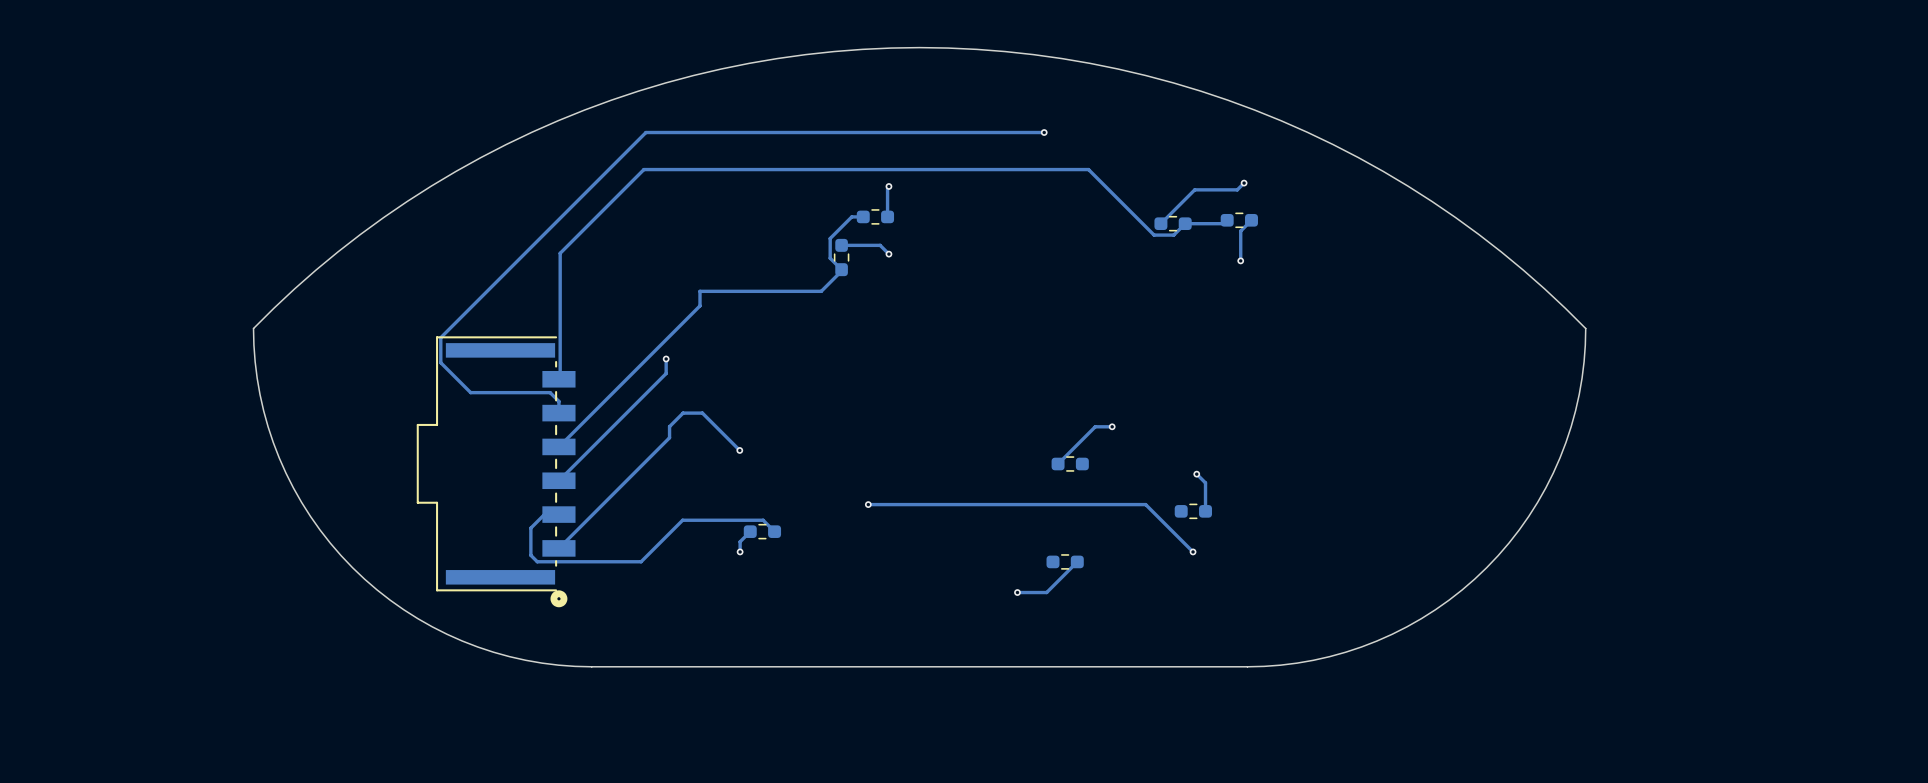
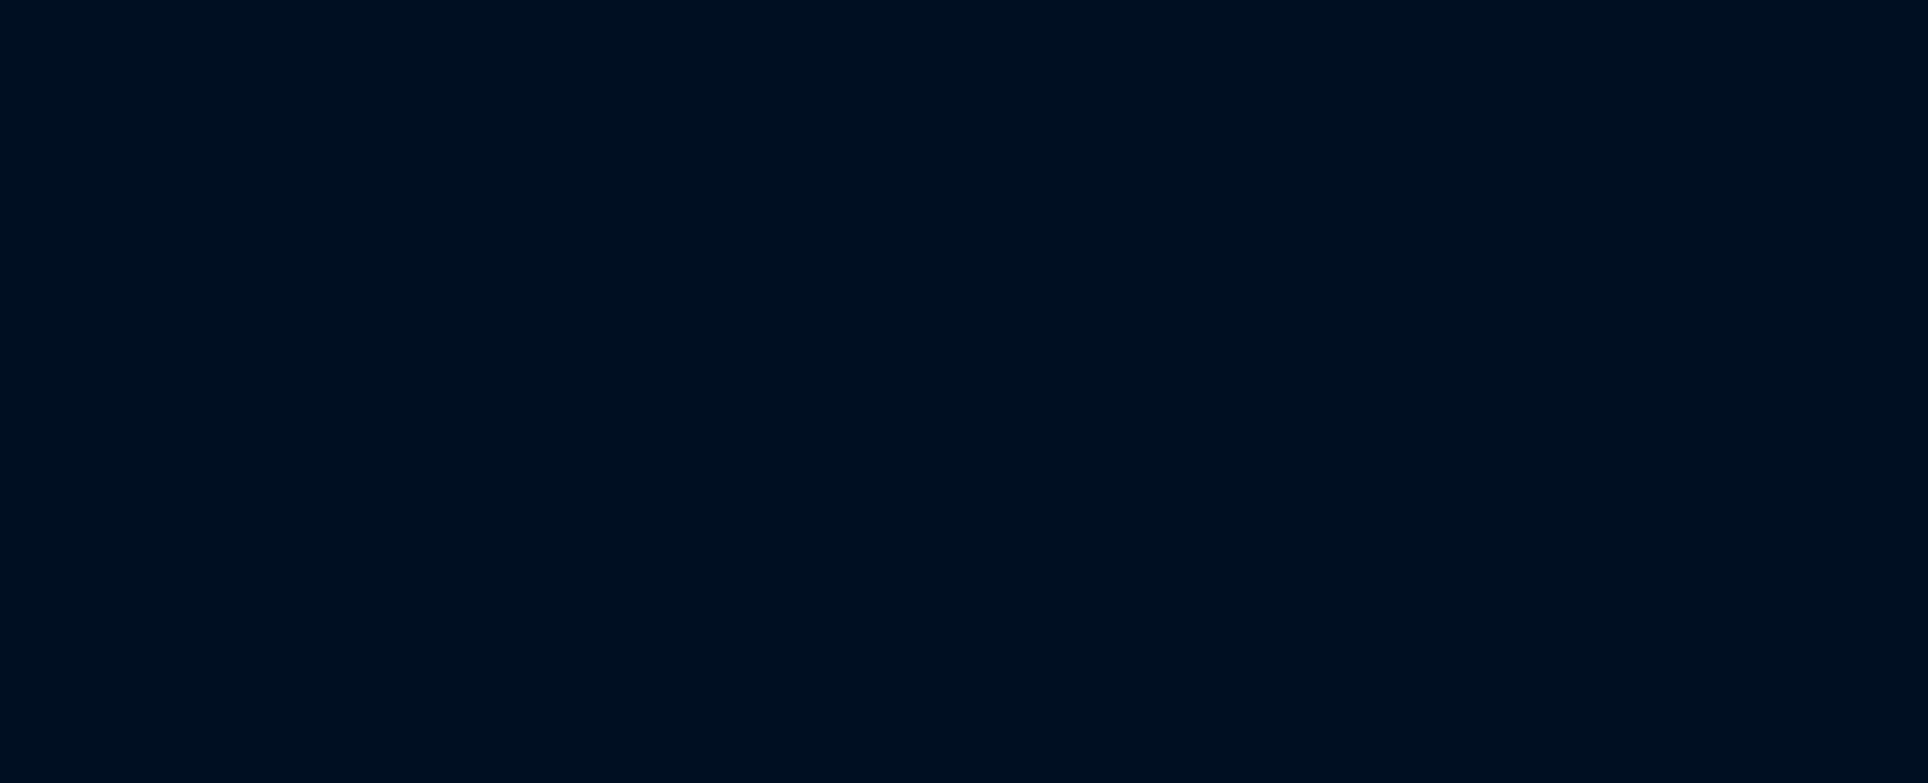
track: (1044, 132) (645, 132) (440, 337) (440, 362) (470, 392) (550, 392) (558, 401) (558, 413) -> none
via: (1044, 132) -> none
track: (1244, 183) (1237, 189) (1194, 189) (1160, 223) -> none
via: (1244, 183) -> none
track: (888, 186) (887, 216) -> none
via: (888, 186) -> none
track: (863, 216) (851, 216) (830, 238) (830, 258) (841, 269) -> none
part: (875, 216) -> none
part: (1239, 220) -> none
track: (1251, 220) (1240, 231) (1240, 260) -> none
part: (1173, 223) -> none
track: (1223, 223) (1185, 223) (1173, 235) (1154, 235) (1088, 169) (643, 169) (560, 253) (558, 379) -> none
track: (841, 245) (880, 245) (888, 254) -> none
via: (888, 254) -> none
part: (841, 257) -> none
via: (1240, 260) -> none
track: (841, 271) (821, 291) (700, 291) (700, 305) (558, 446) -> none
board edge: (1585, 328) (1523, 270) (1455, 217) (1383, 171) (1332, 144) (1281, 120) (1200, 91) (1117, 69) (1061, 58) (1005, 51) (919, 47) (834, 51) (777, 58) (721, 69) (638, 91) (558, 120) (480, 157) (407, 201) (360, 234) (316, 270) (253, 328) (255, 361) (260, 394) (268, 426) (279, 457) (293, 487) (310, 516) (330, 543) (352, 567) (377, 590) (403, 609) (432, 626) (462, 641) (493, 652) (525, 660) (558, 665) (591, 666) (1264, 666) (1313, 660) (1361, 647) (1406, 626) (1448, 600) (1486, 567) (1519, 530) (1545, 487) (1565, 442) (1579, 394) (1584, 361) (1585, 328) -> none
track: (666, 358) (666, 373) (558, 480) -> none
via: (666, 358) -> none
track: (1112, 426) (1095, 426) (1058, 464) -> none
via: (1112, 426) -> none
track: (739, 450) (702, 413) (683, 413) (669, 426) (669, 437) (558, 548) -> none
via: (739, 450) -> none
part: (1070, 464) -> none
part: (496, 471) -> none
track: (1196, 474) (1205, 482) (1205, 511) -> none
via: (1196, 474) -> none
track: (868, 504) (1145, 504) (1193, 551) -> none
via: (868, 504) -> none
part: (1193, 511) -> none
track: (558, 514) (544, 514) (530, 528) (530, 555) (537, 561) (641, 561) (682, 520) (763, 520) (774, 531) -> none
track: (750, 531) (740, 541) (740, 551) -> none
part: (762, 531) -> none
via: (740, 551) -> none
via: (1193, 551) -> none
part: (1065, 561) -> none
track: (1077, 561) (1046, 592) (1017, 592) -> none
via: (1017, 592) -> none

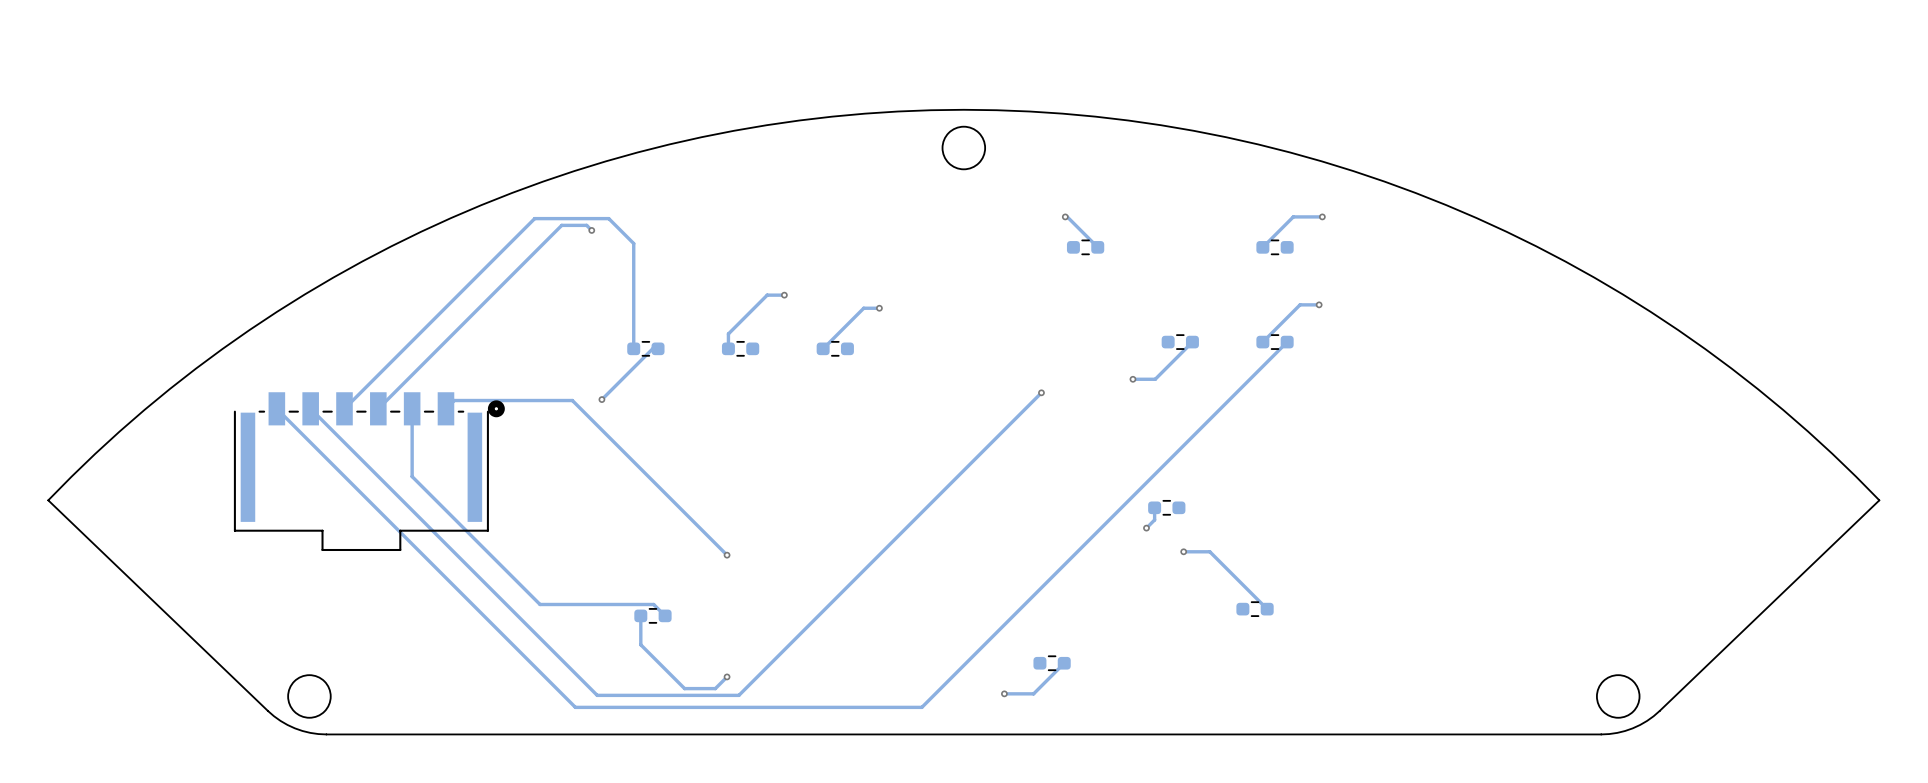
round board edge: none -> [941, 126, 986, 170]
track: none -> (1065, 216) (1097, 247)
via: none -> (1065, 216)
track: none -> (1322, 216) (1293, 216) (1262, 247)
via: none -> (1322, 216)
track: none -> (591, 230) (586, 225) (561, 225) (378, 408)
via: none -> (591, 230)
part: none -> (1085, 247)
part: none -> (1275, 247)
track: none -> (784, 295) (767, 295) (728, 333) (728, 348)
via: none -> (784, 295)
track: none -> (1319, 304) (1300, 304) (1262, 342)
via: none -> (1319, 304)
track: none -> (879, 308) (863, 308) (823, 348)
via: none -> (879, 308)
part: none -> (1180, 342)
track: none -> (1192, 342) (1155, 379) (1132, 379)
part: none -> (1275, 342)
track: none -> (1287, 342) (921, 707) (575, 707) (276, 408)
track: none -> (633, 348) (633, 243) (608, 218) (534, 218) (344, 408)
part: none -> (645, 348)
track: none -> (658, 348) (652, 348) (601, 399)
part: none -> (740, 348)
part: none -> (835, 348)
via: none -> (1132, 379)
track: none -> (1041, 392) (738, 695) (597, 695) (310, 408)
via: none -> (1041, 392)
via: none -> (601, 399)
track: none -> (412, 408) (412, 476) (540, 604) (653, 604) (665, 615)
track: none -> (445, 408) (454, 400) (572, 400) (727, 555)
part: none -> (369, 471)
board edge: none -> (1879, 500) (1653, 716) (1640, 724) (1625, 730) (1601, 734) (326, 734) (310, 732) (287, 724) (267, 710) (48, 500) (95, 453) (144, 409) (195, 368) (249, 330) (304, 294) (362, 261) (421, 231) (481, 205) (574, 171) (637, 152) (701, 137) (766, 125) (832, 116) (897, 111) (963, 109) (1029, 111) (1095, 116) (1161, 125) (1225, 137) (1290, 152) (1353, 171) (1415, 192) (1476, 218) (1536, 246) (1594, 277) (1650, 311) (1705, 349) (1783, 409) (1832, 453) (1879, 500)
track: none -> (1154, 507) (1154, 519) (1146, 528)
part: none -> (1166, 507)
via: none -> (1146, 528)
track: none -> (1183, 551) (1209, 551) (1267, 609)
via: none -> (1183, 551)
via: none -> (727, 555)
part: none -> (1255, 609)
track: none -> (640, 615) (640, 644) (684, 688) (715, 688) (727, 676)
part: none -> (652, 615)
part: none -> (1052, 663)
track: none -> (1064, 663) (1033, 693) (1004, 693)
round board edge: none -> [287, 674, 332, 719]
round board edge: none -> [1596, 674, 1641, 719]
via: none -> (727, 676)
via: none -> (1004, 693)

